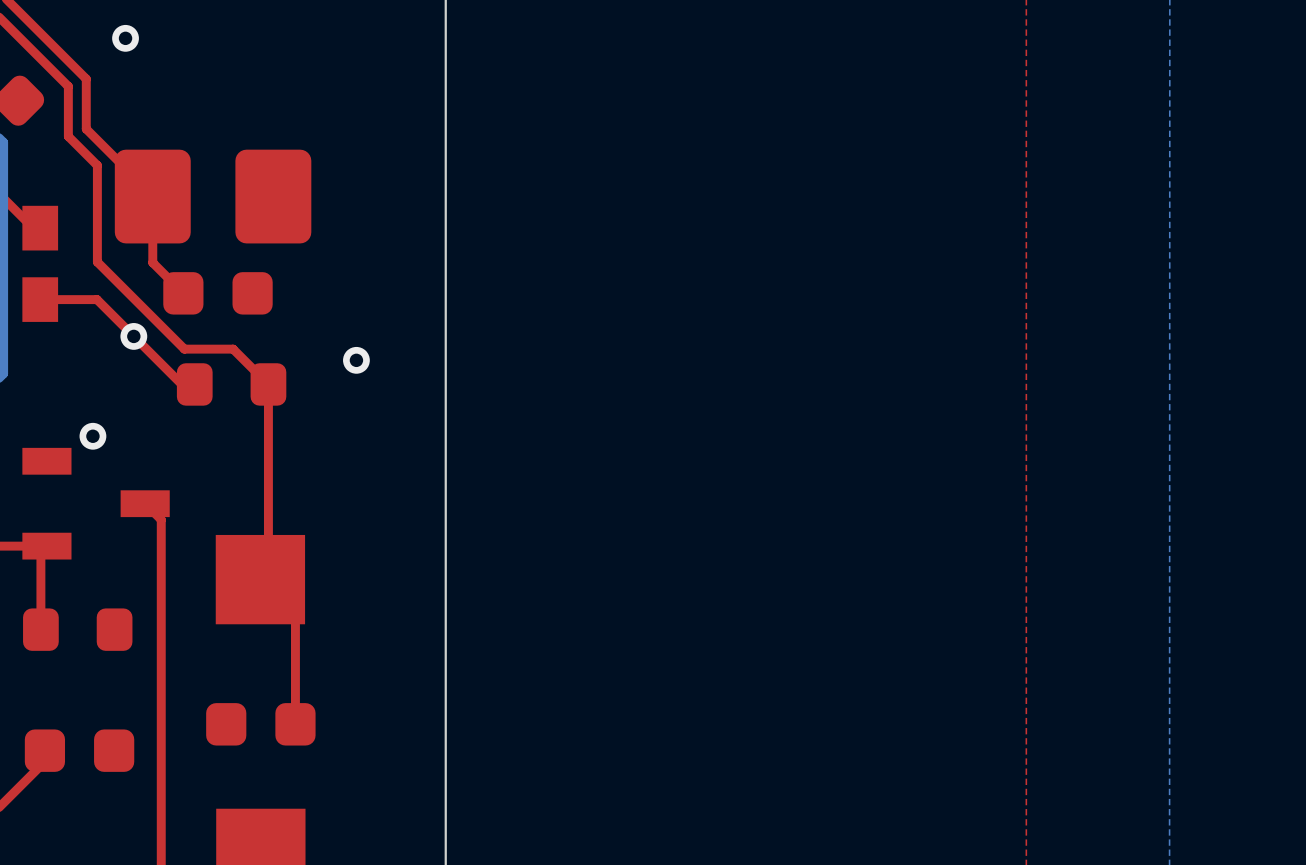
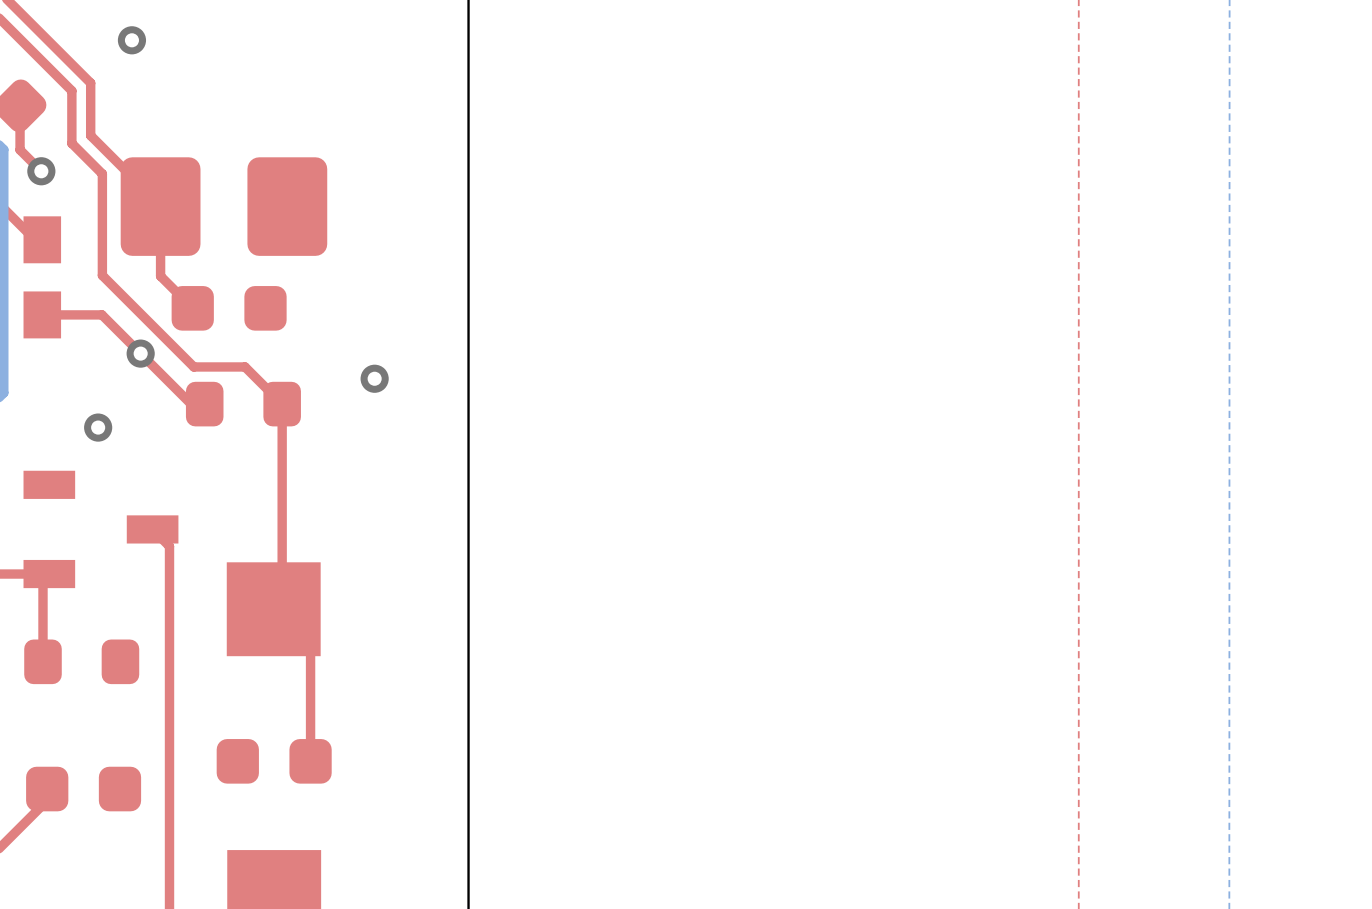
top track: none -> (20, 105) (20, 149) (41, 171)
via: none -> (41, 171)
via: none -> (98, 427)
via: (92, 436) -> none

